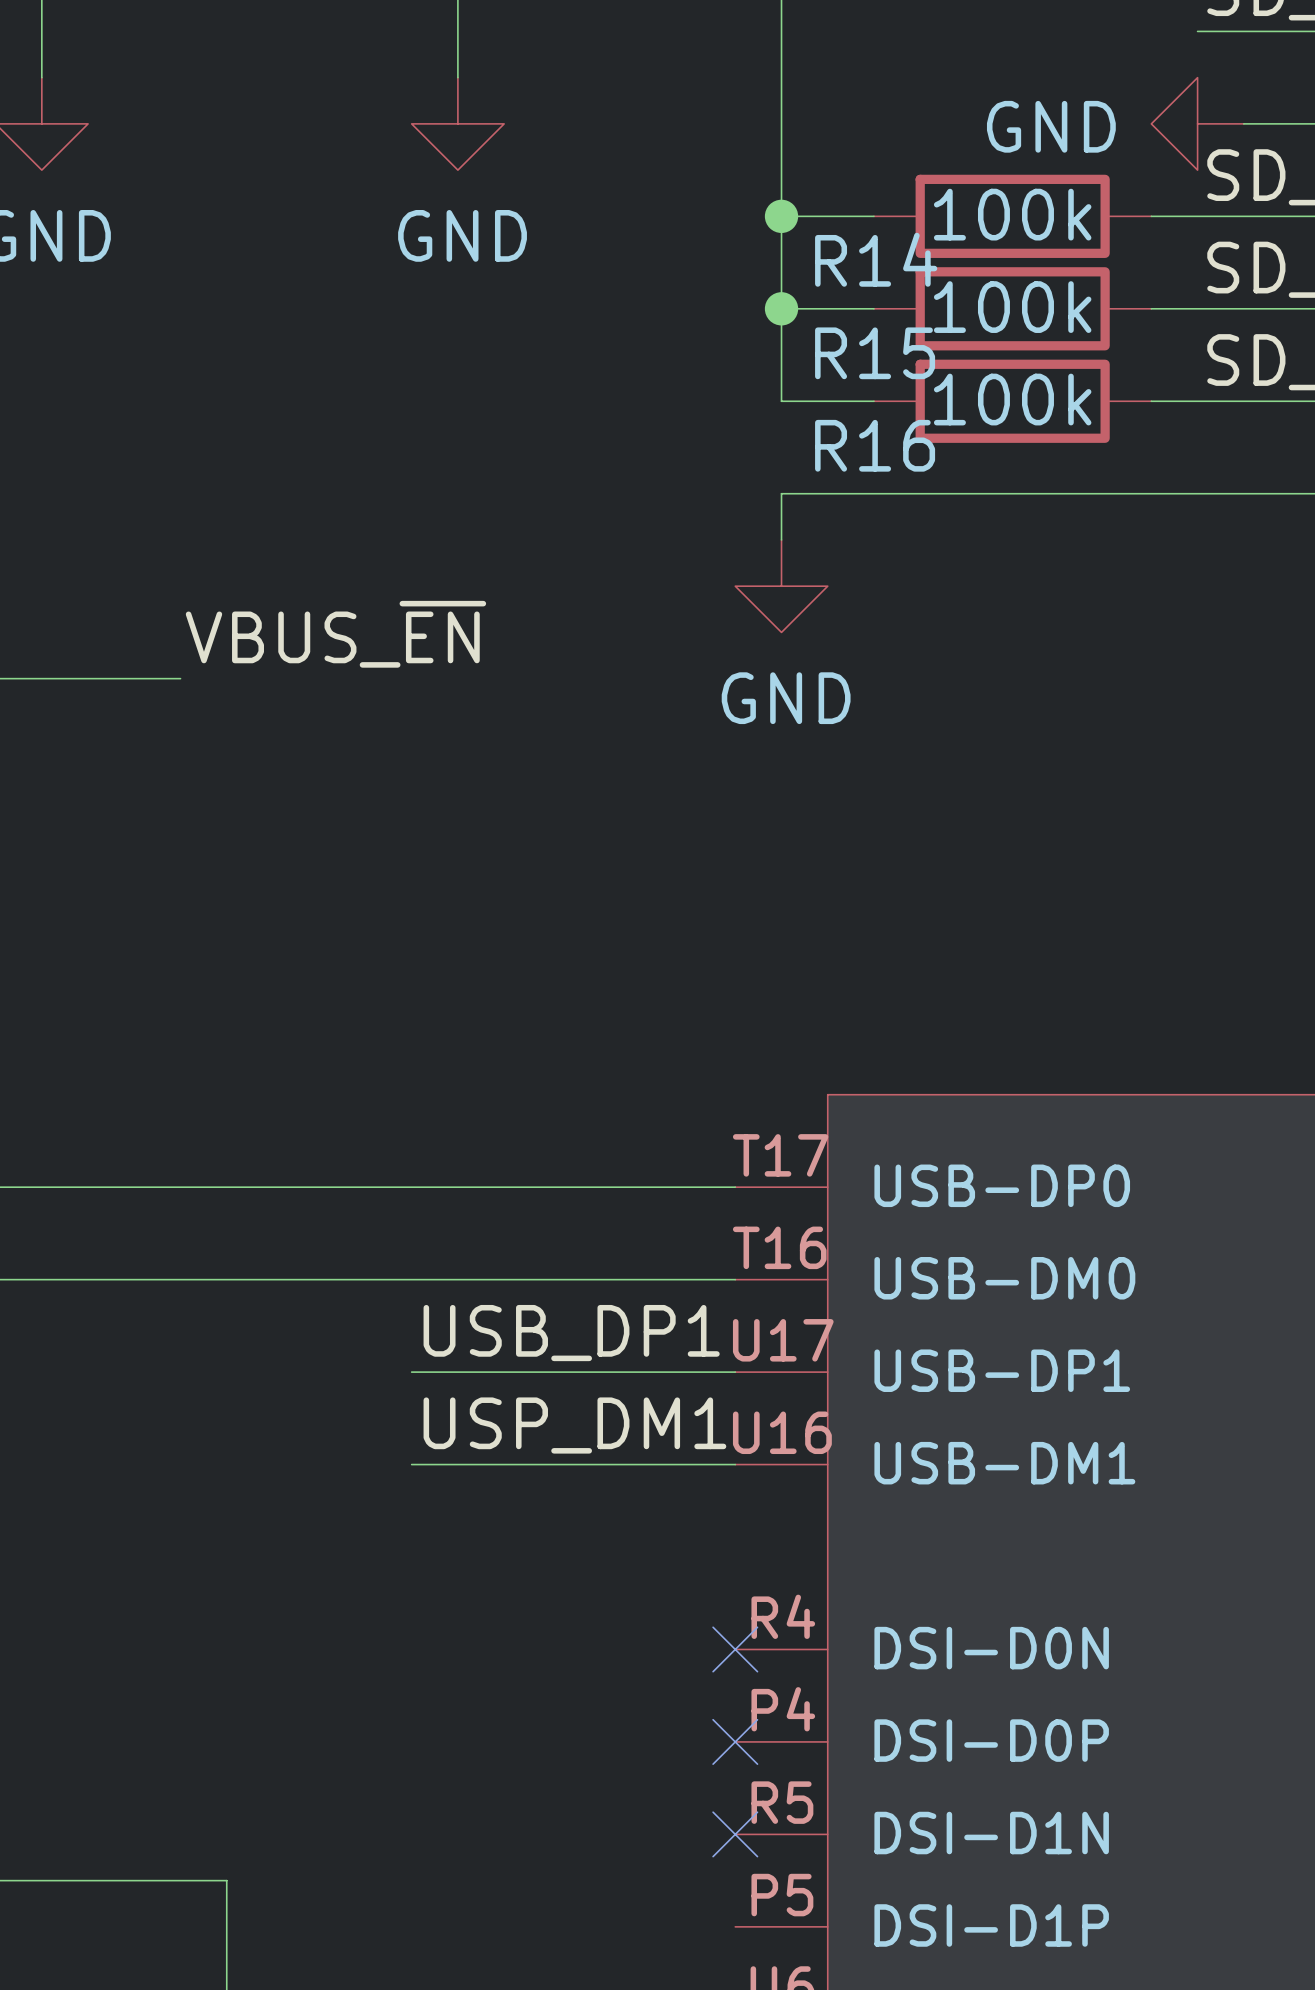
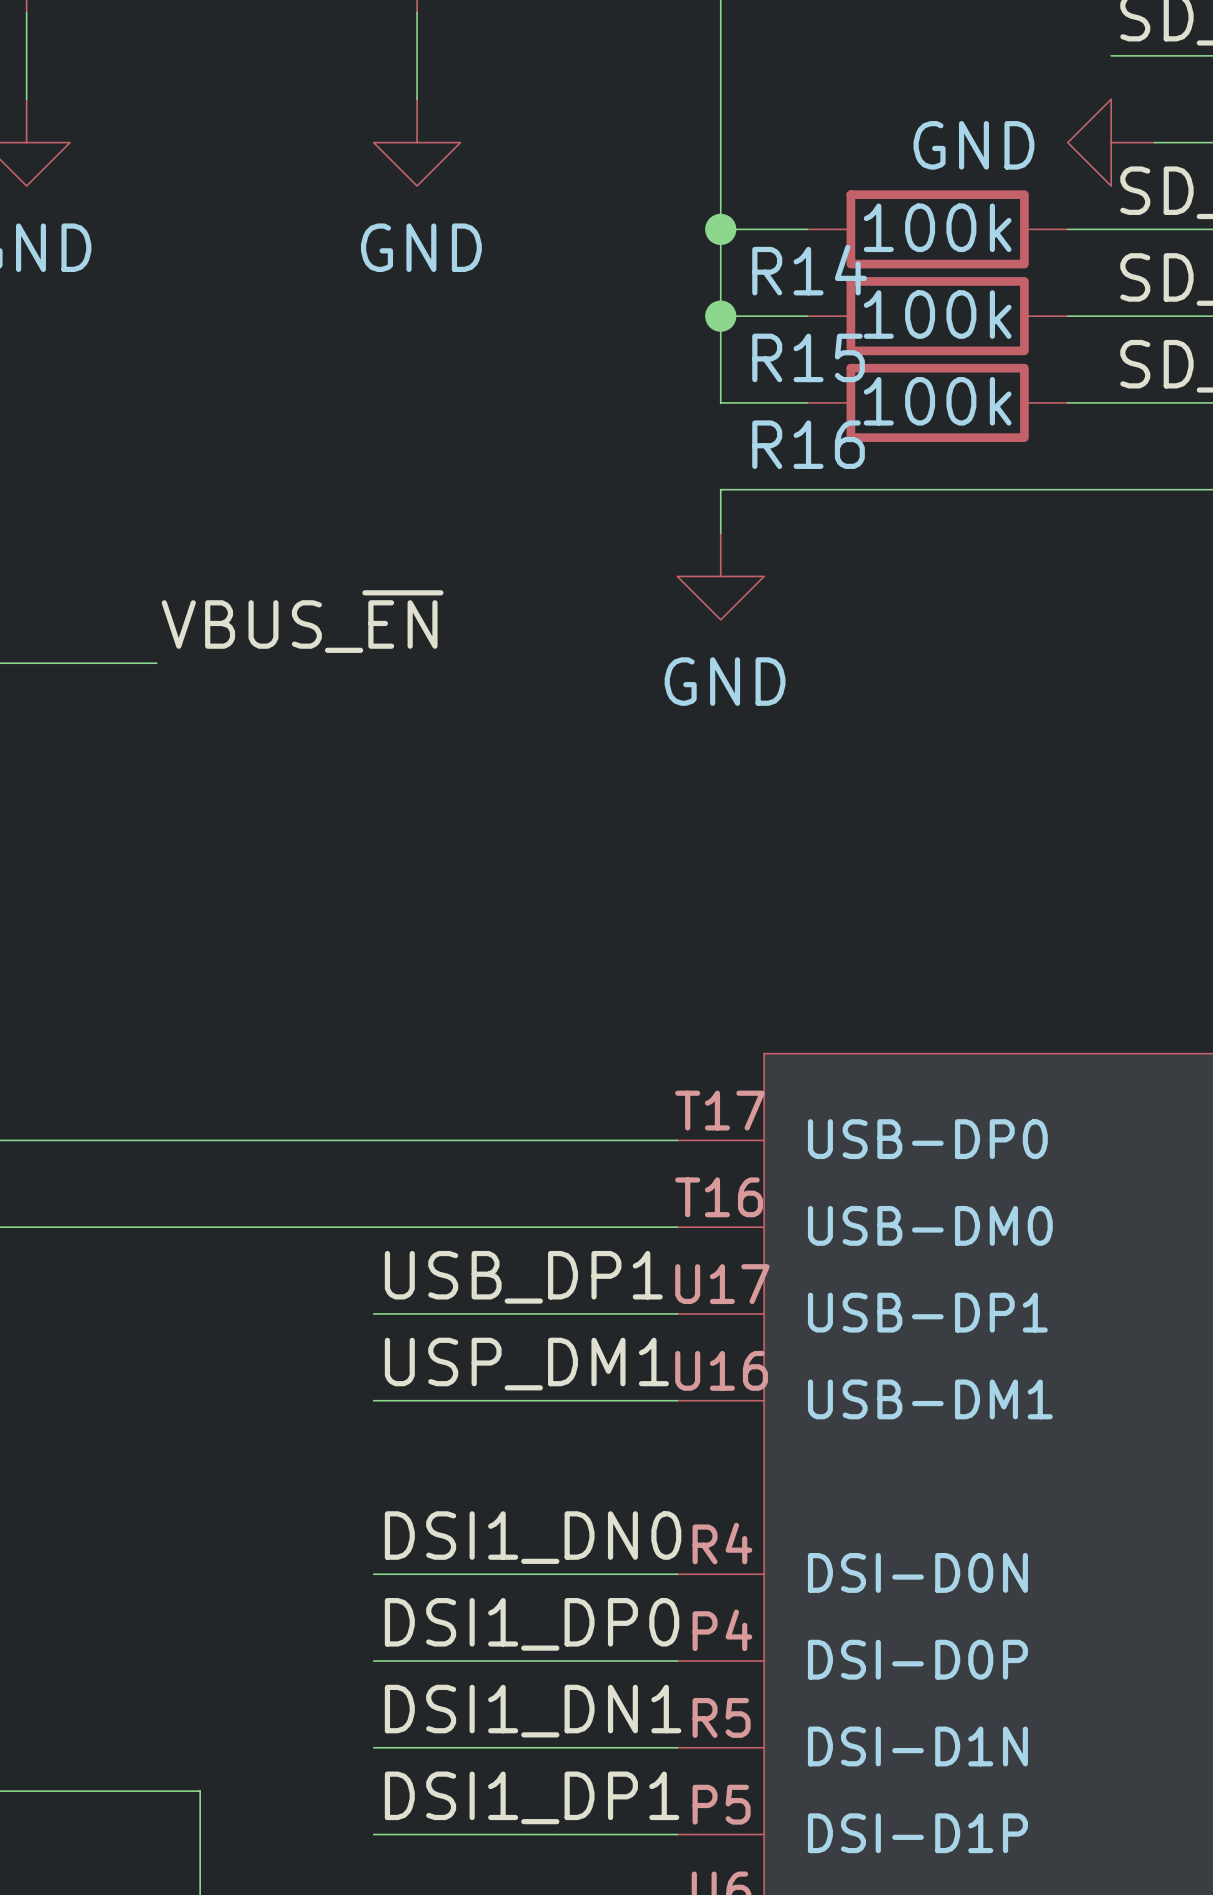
label: none -> DSI1_DN0 (533, 1537)
wire: none -> (373, 1574) (677, 1574)
no-connect mark: (735, 1649) -> none
label: none -> DSI1_DP0 (532, 1624)
wire: none -> (373, 1661) (677, 1661)
no-connect mark: (735, 1741) -> none
label: none -> DSI1_DN1 (533, 1711)
wire: none -> (373, 1747) (677, 1747)
no-connect mark: (735, 1834) -> none
label: none -> DSI1_DP1 (532, 1797)
wire: none -> (373, 1834) (677, 1834)

